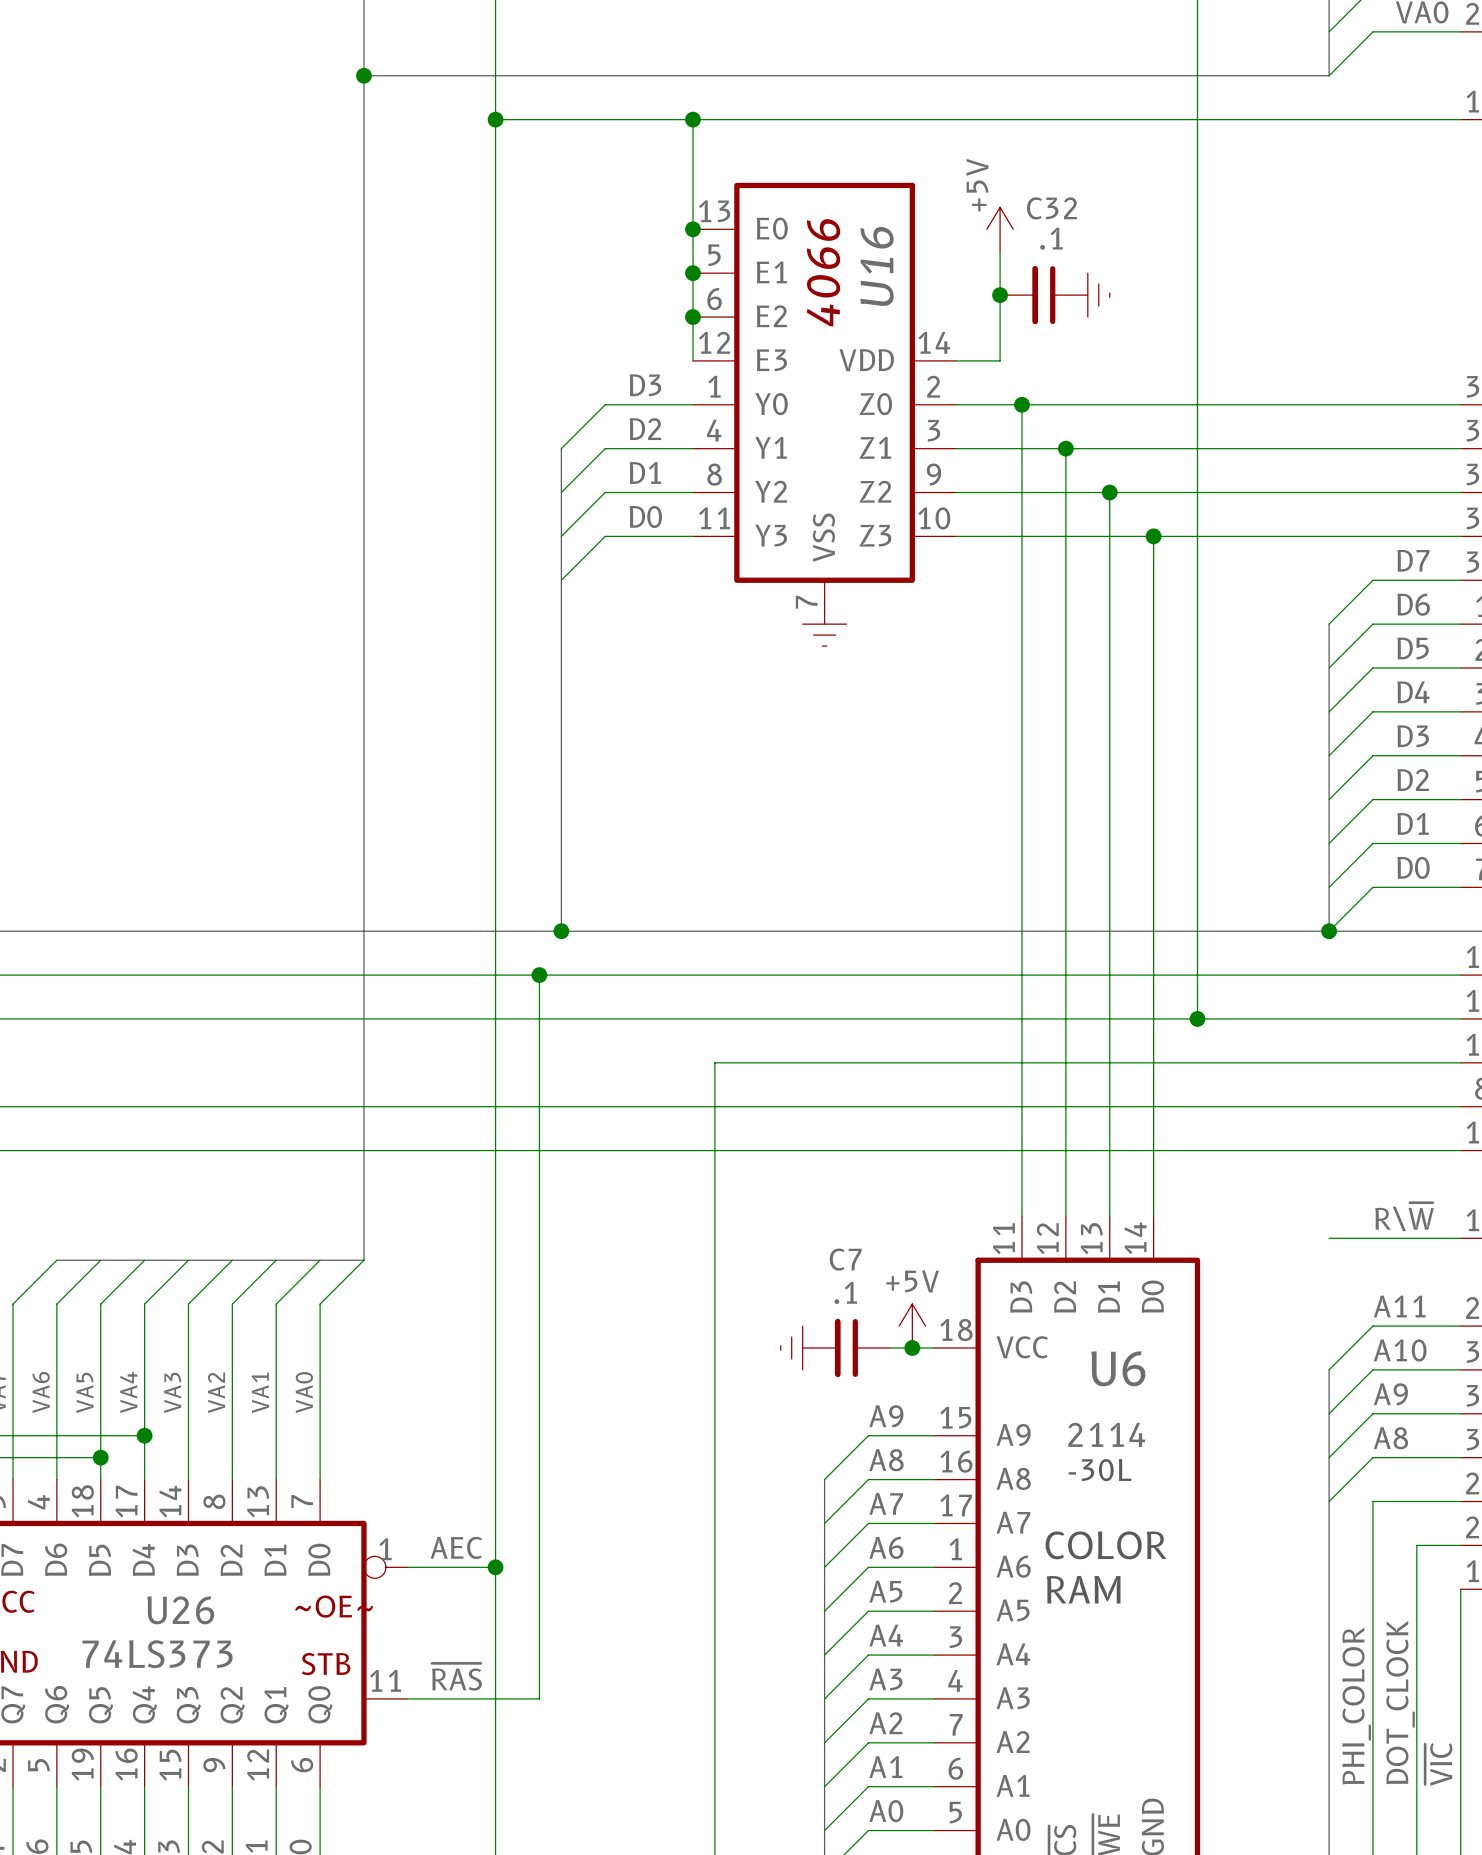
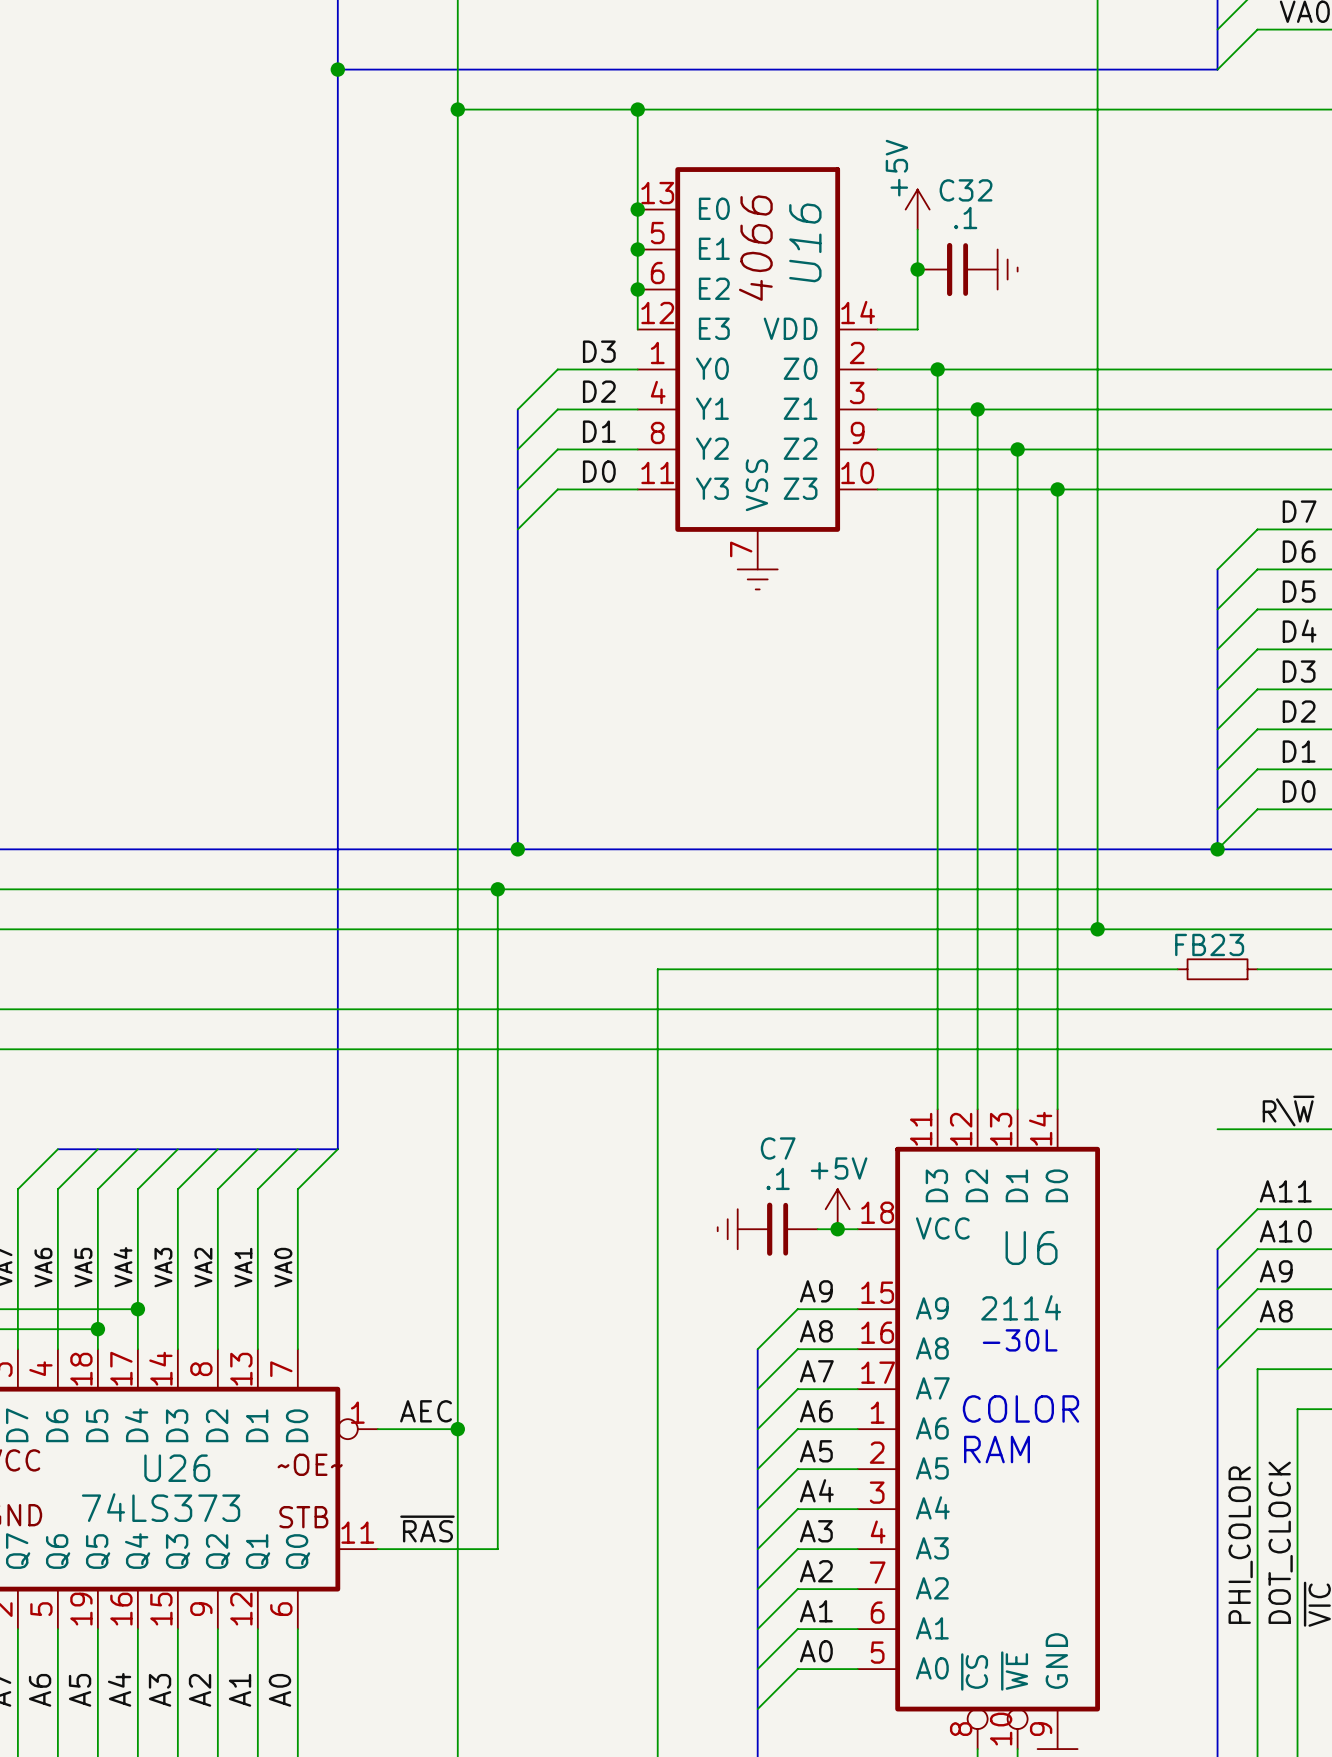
wire: (1285, 1062) (1372, 1062) -> none
FB23: none -> (1217, 969)

